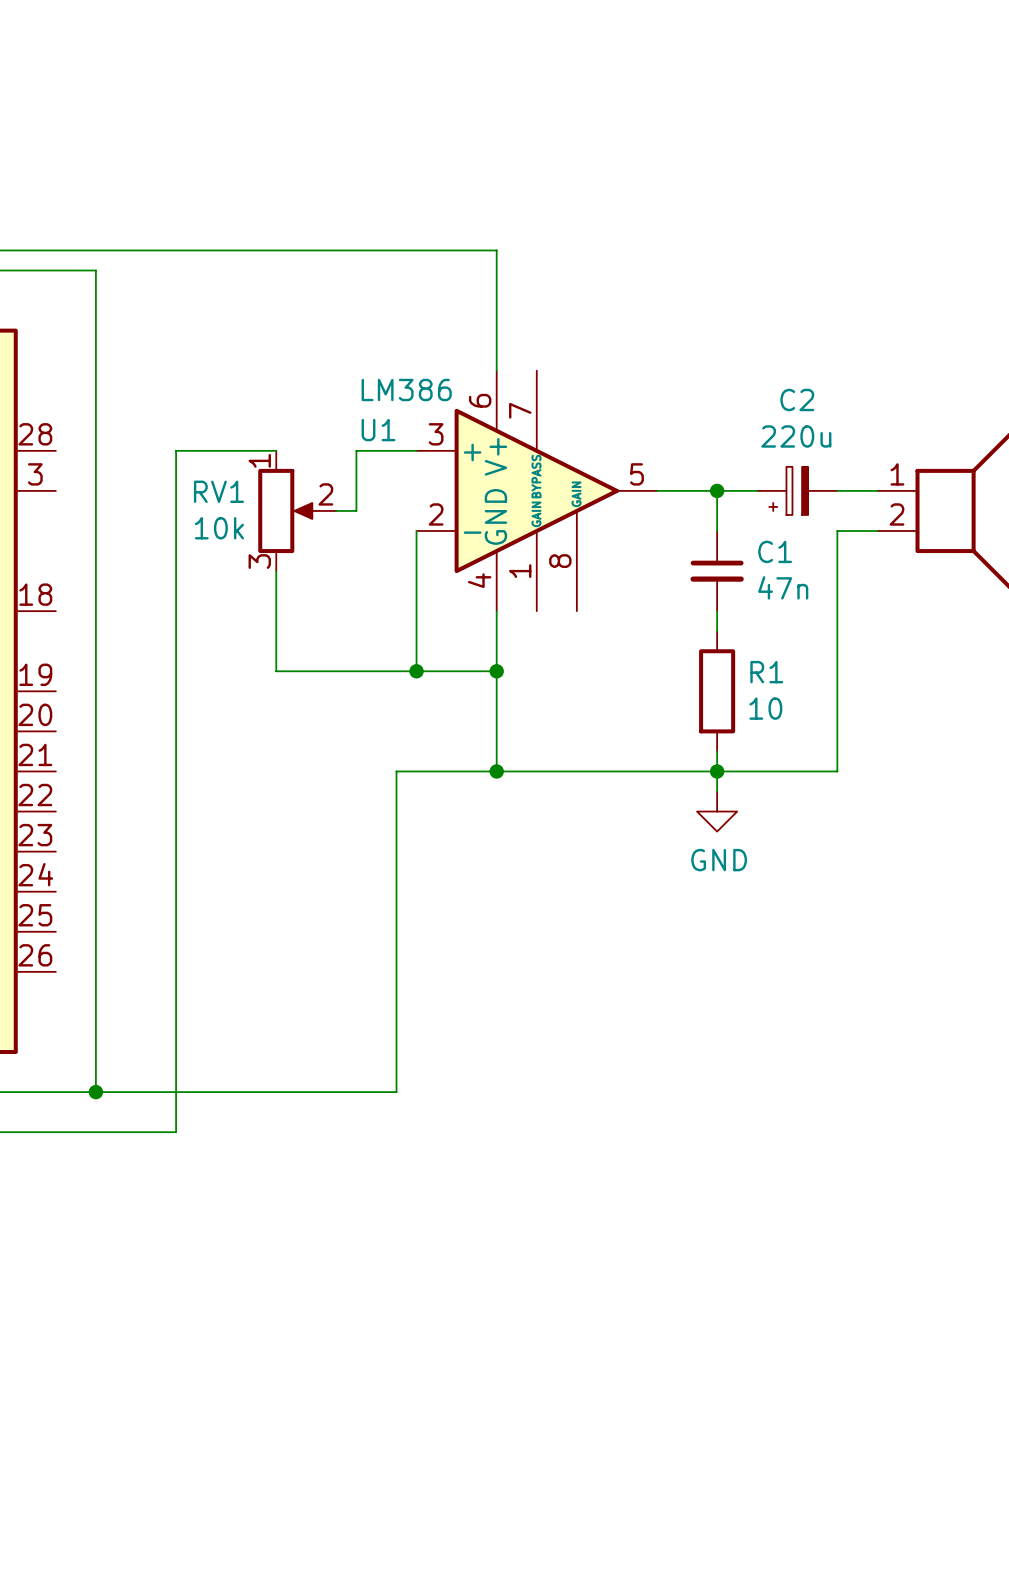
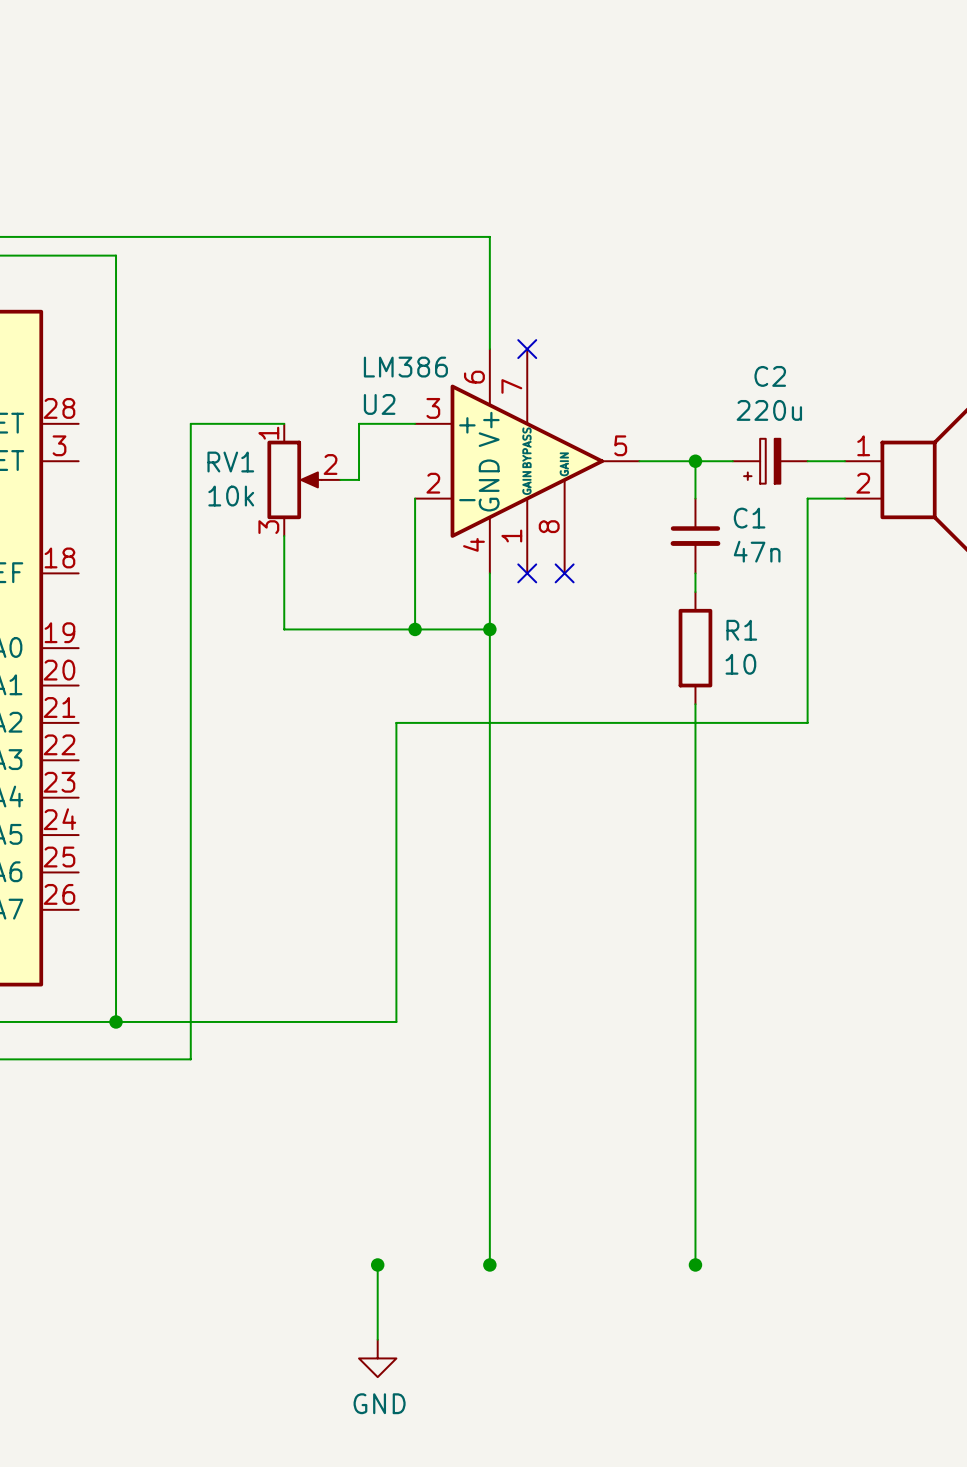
no-connect mark: none -> (527, 349)
U1 name: U1 (378, 430) -> U2 (379, 404)
no-connect mark: none -> (527, 573)
no-connect mark: none -> (564, 573)
wire: none -> (489, 722) (489, 1264)
junction: (496, 771) -> none
junction: (717, 771) -> none
wire: none -> (695, 741) (695, 1264)
power symbol: GND (717, 811) -> none
wire: none -> (377, 1264) (377, 1339)
junction: none -> (377, 1264)
junction: none -> (489, 1264)
junction: none -> (695, 1264)
power symbol: none -> GND (377, 1358)

